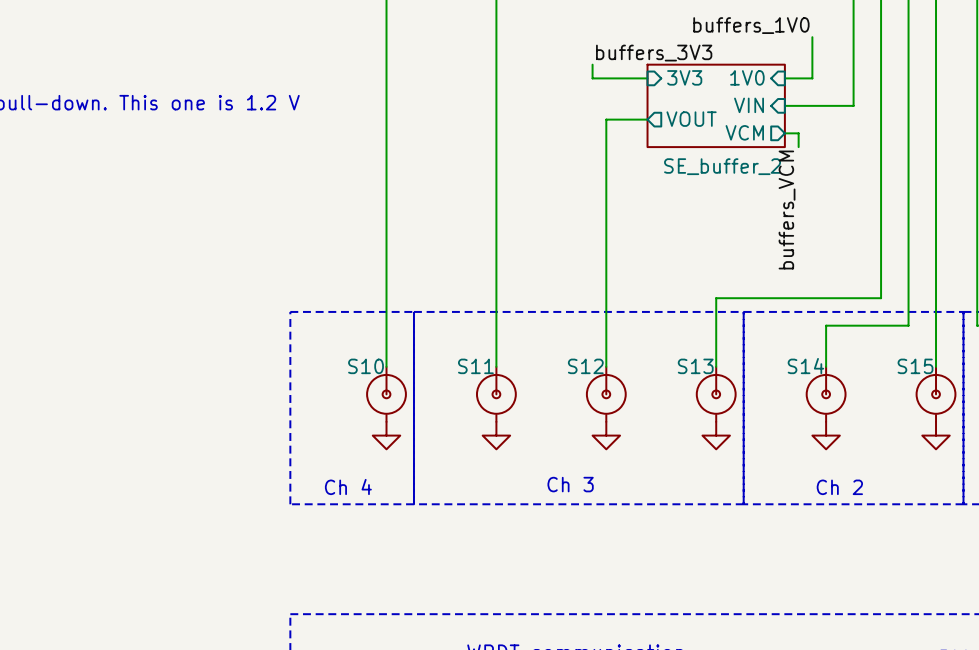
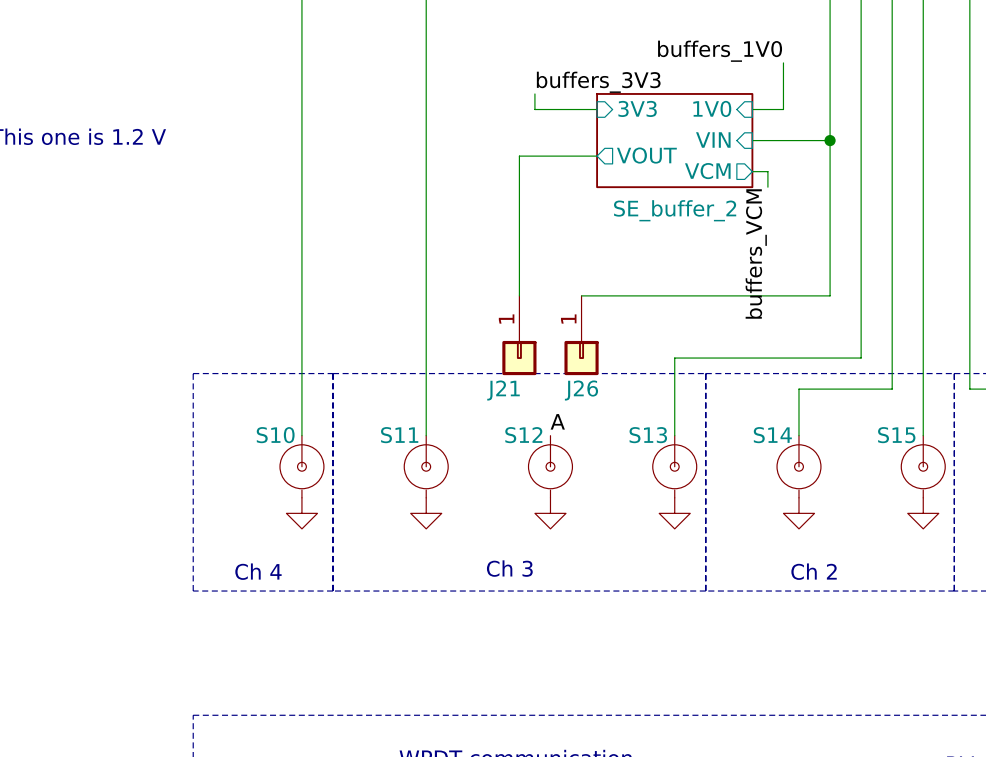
wire: none -> (830, 140) (830, 295) (581, 295)
junction: none -> (830, 140)
wire: (606, 119) (606, 366) -> (550, 156) (519, 156) (519, 295)
J21: none -> (519, 335)
J26: none -> (581, 335)
label: none -> A (557, 421)

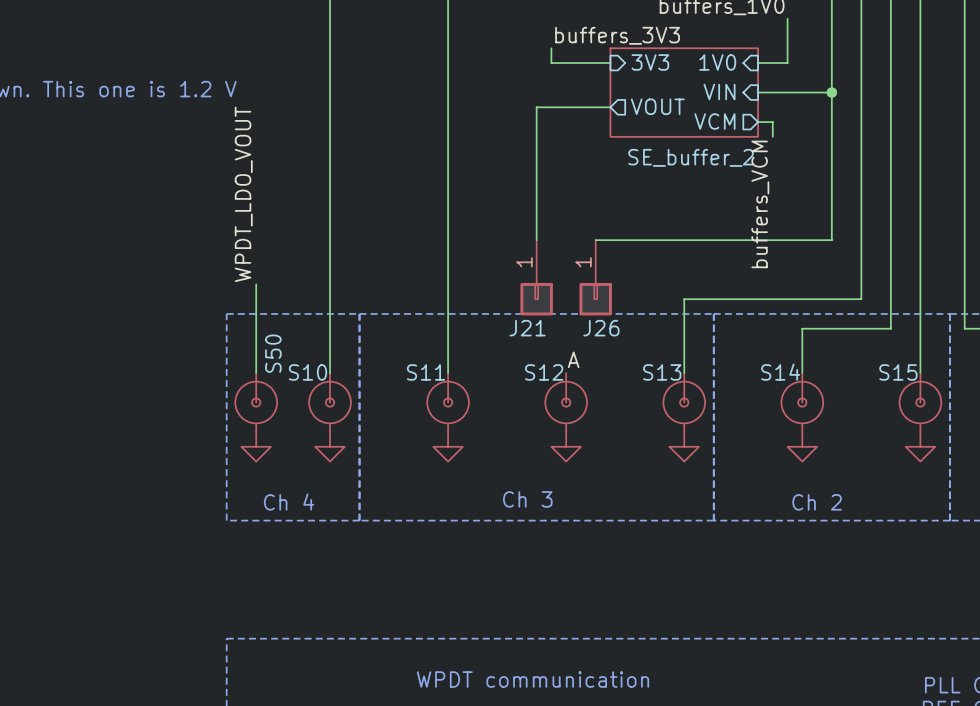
label: none -> WPDT_LDO_VOUT (243, 194)
wire: none -> (256, 284) (256, 372)
S50: none -> (256, 402)
power symbol: none -> (256, 446)

